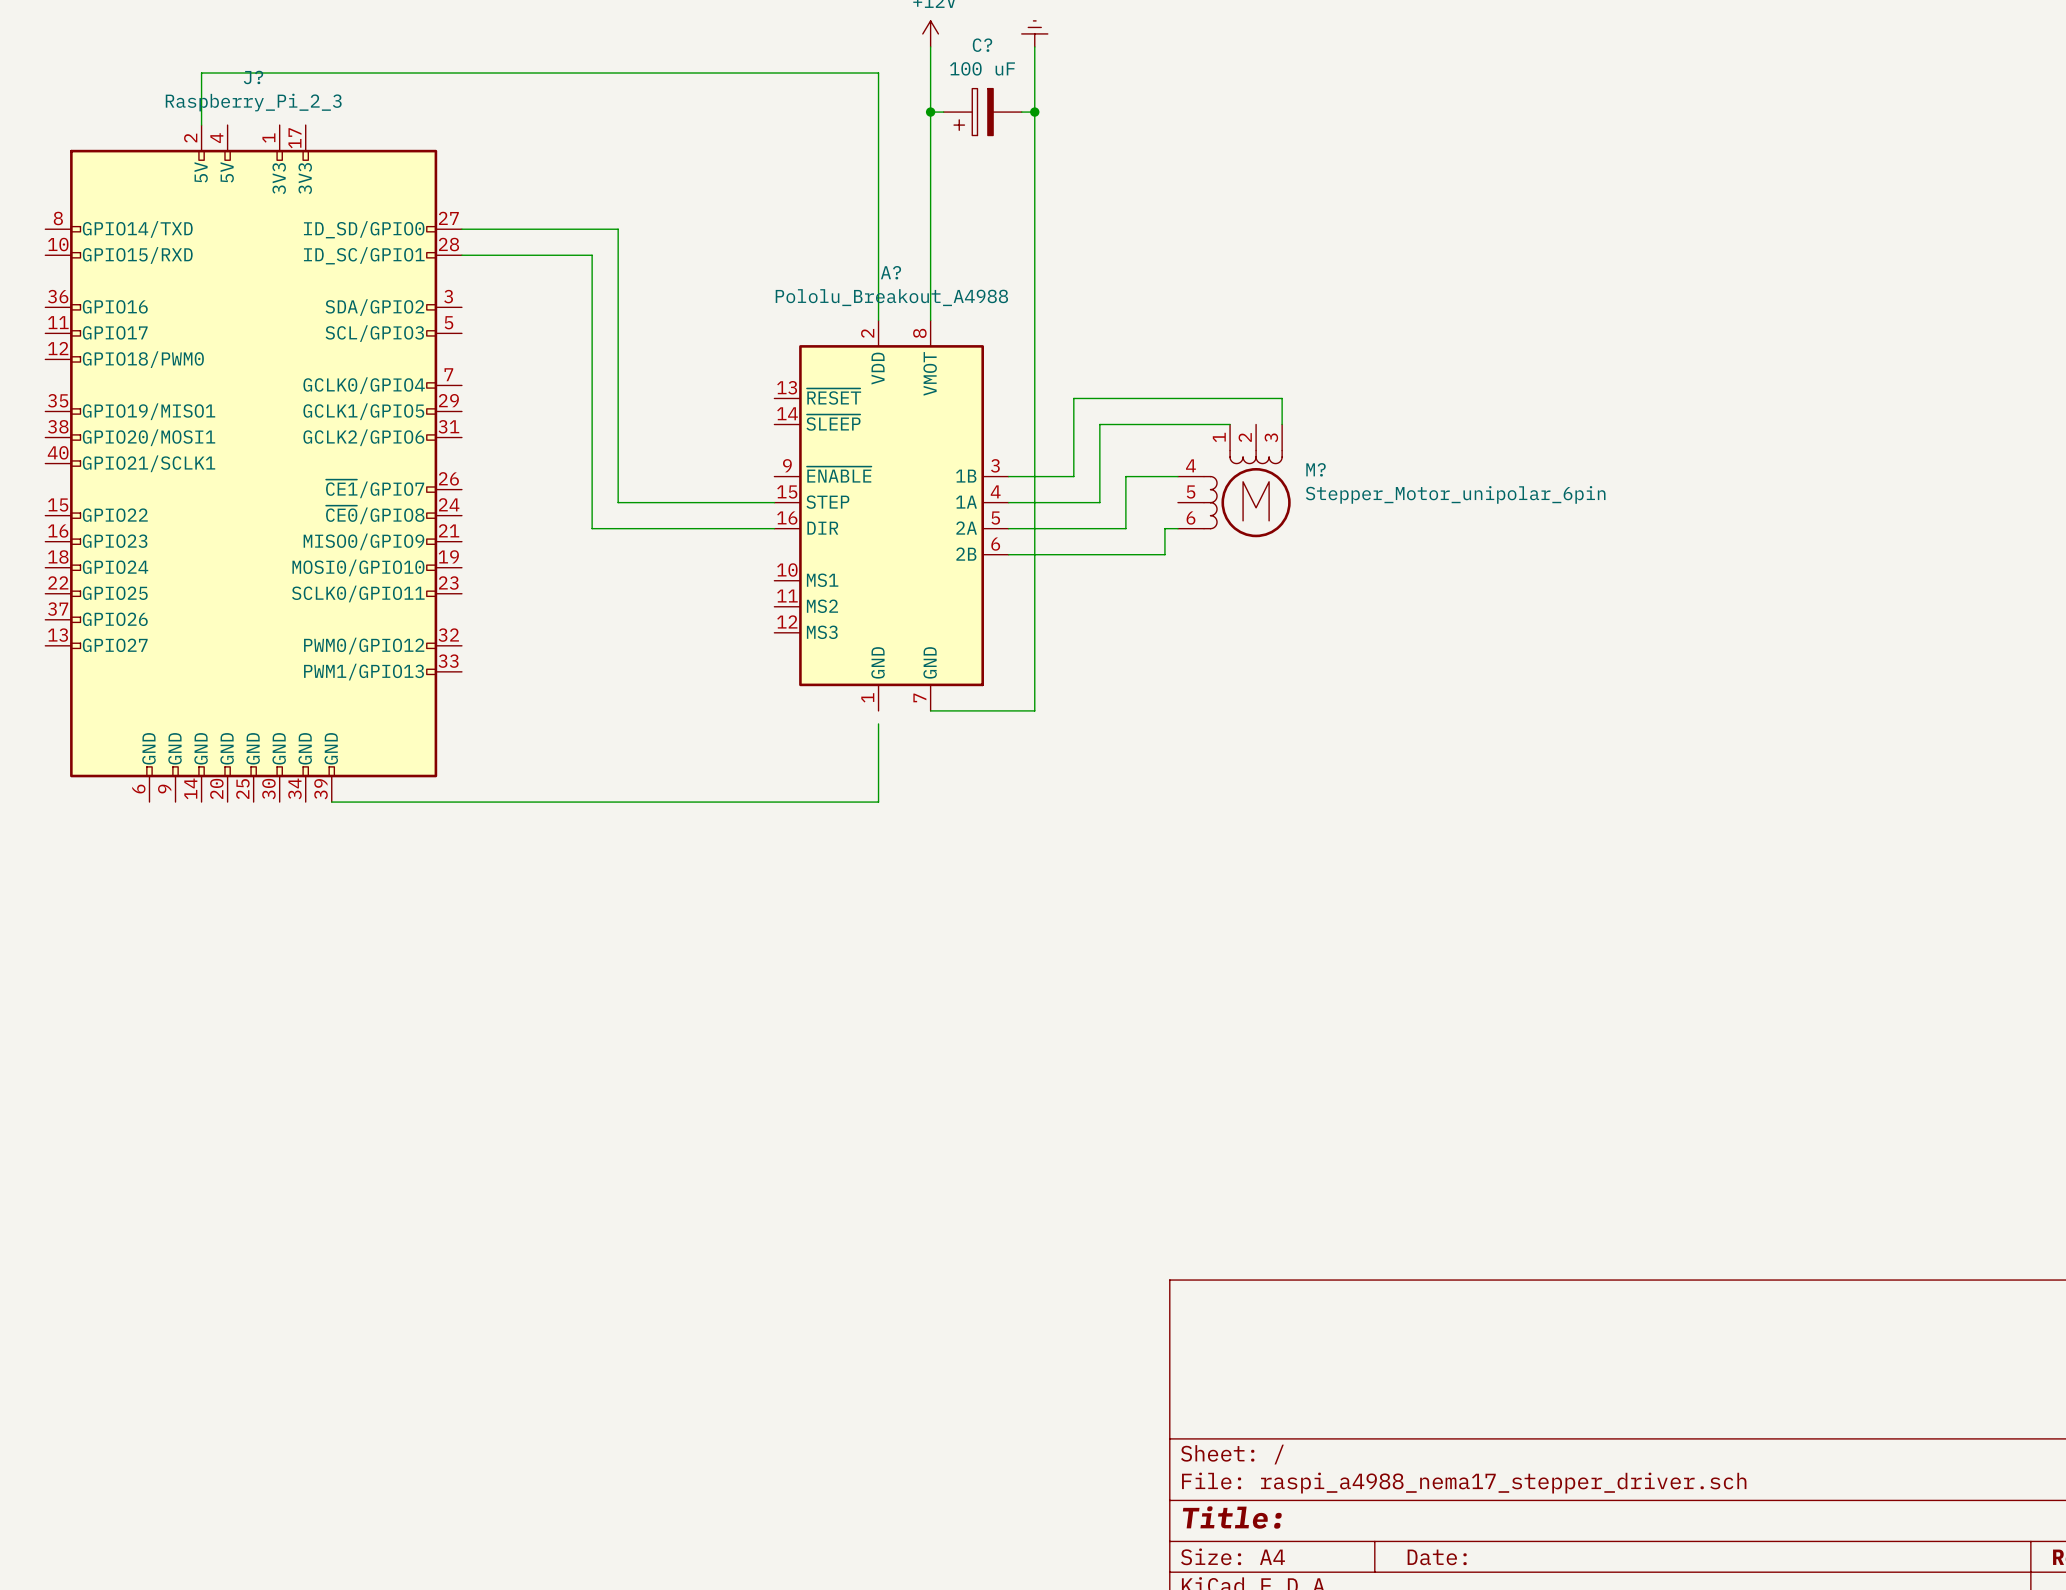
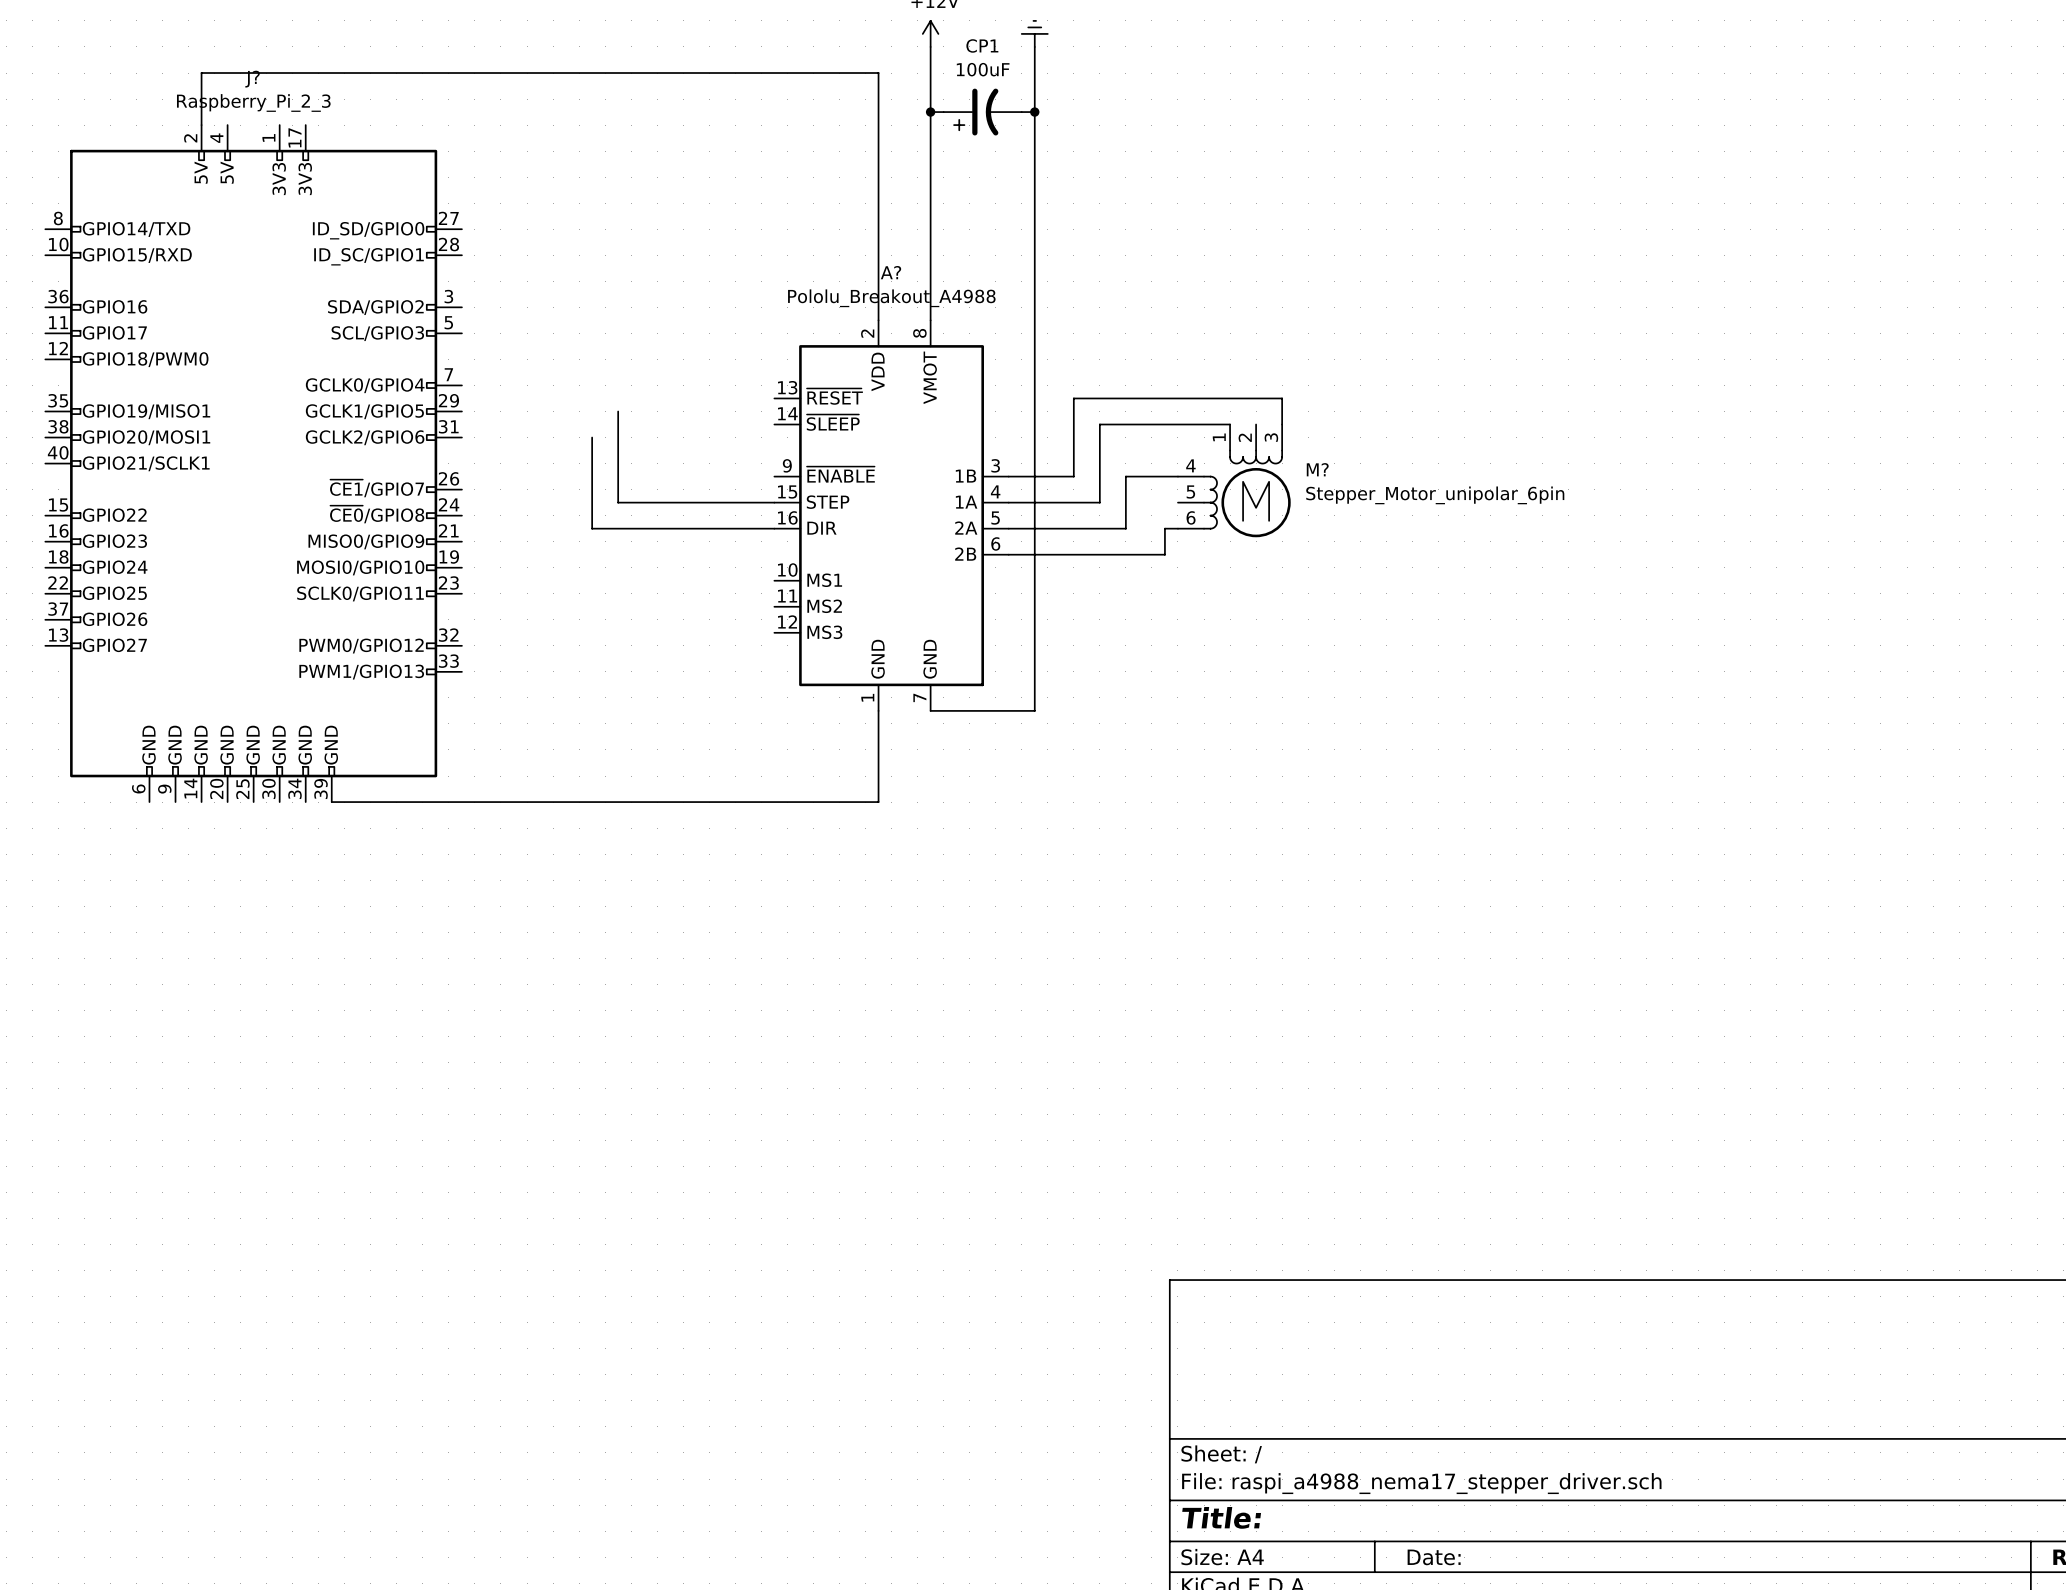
C?: 100 uF (982, 112) -> none
CP1: none -> 100uF (982, 112)
wire: (461, 229) (618, 229) (618, 411) -> none
wire: (461, 255) (592, 255) (592, 437) -> none
wire: none -> (878, 710) (878, 723)

